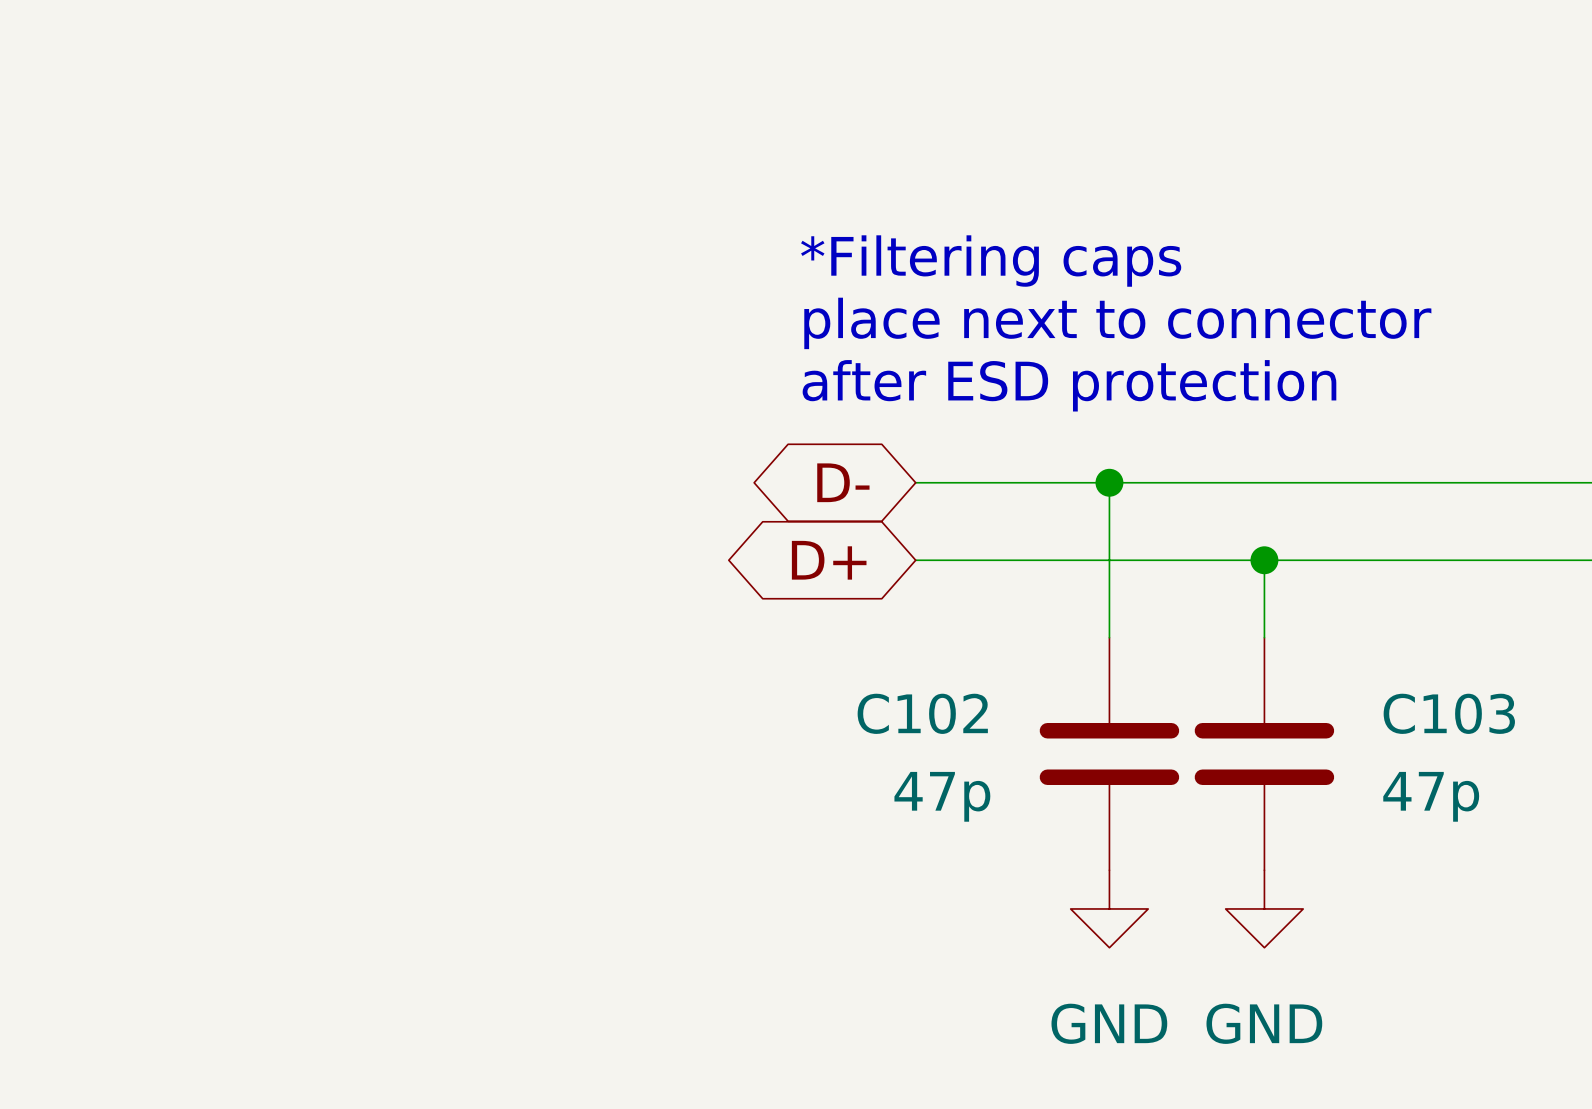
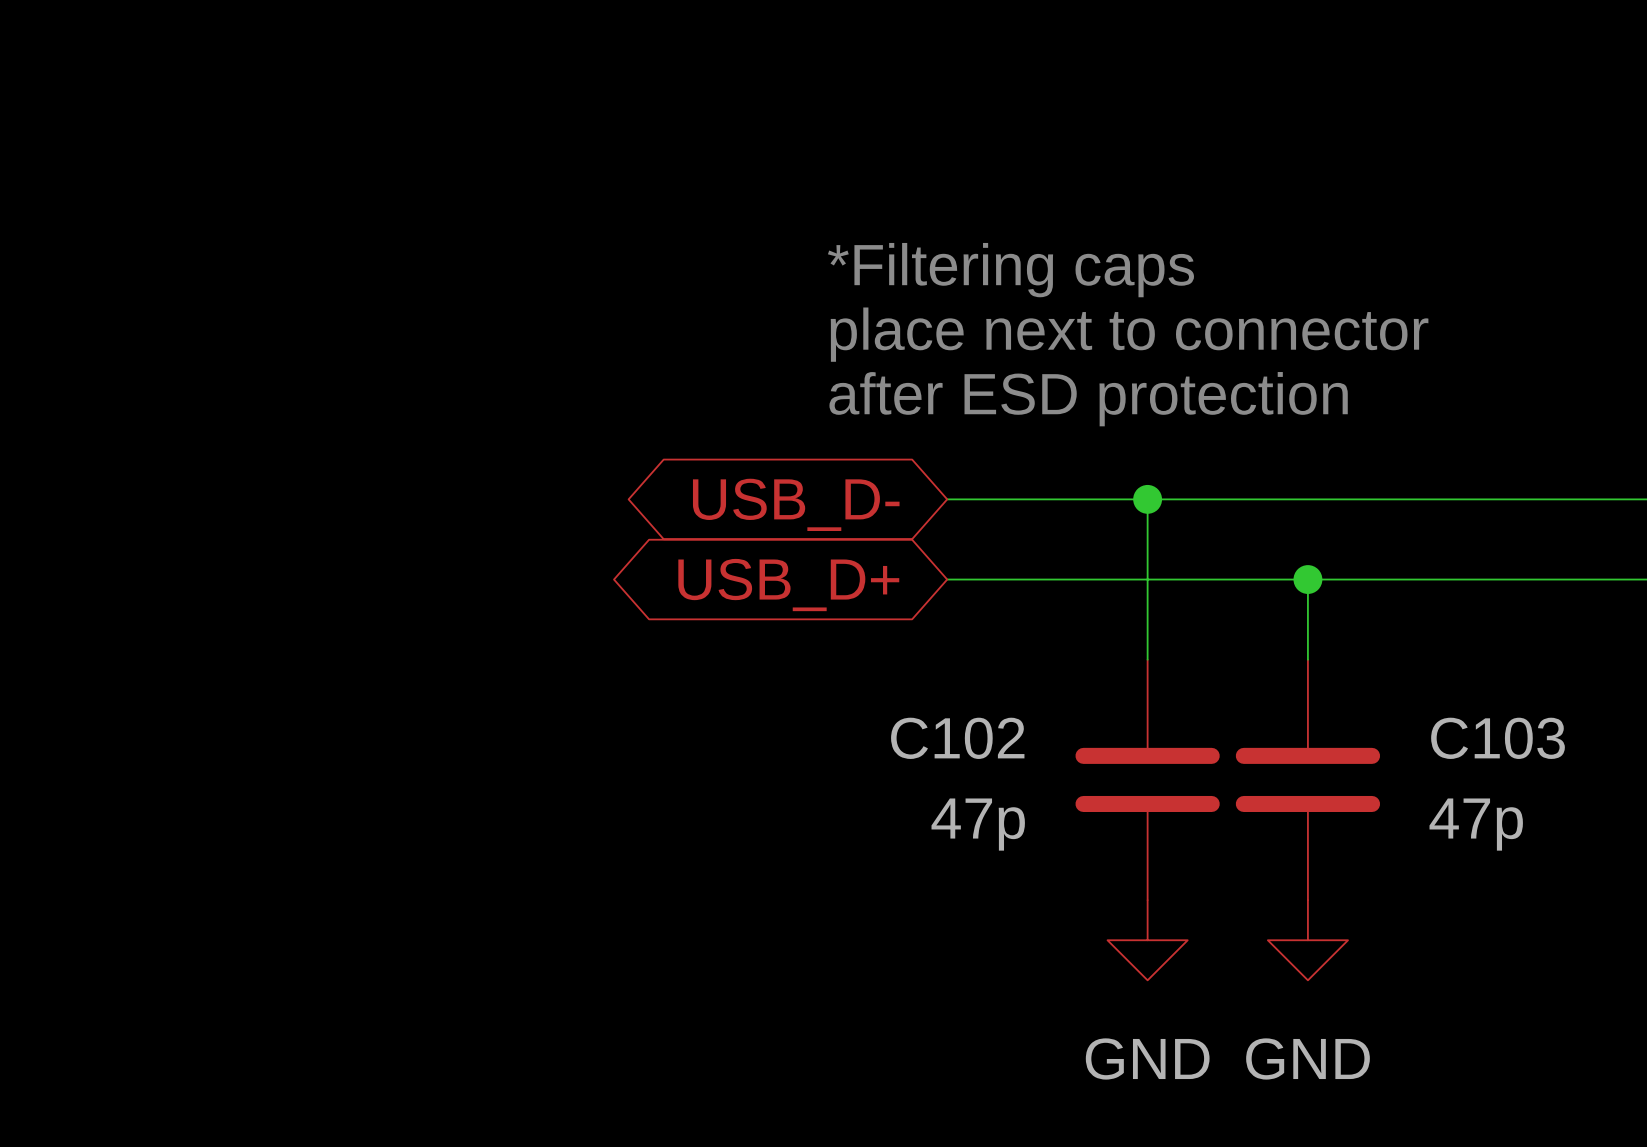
global label: D- (843, 482) -> USB_D- (796, 504)
global label: D+ (829, 560) -> USB_D+ (788, 585)

